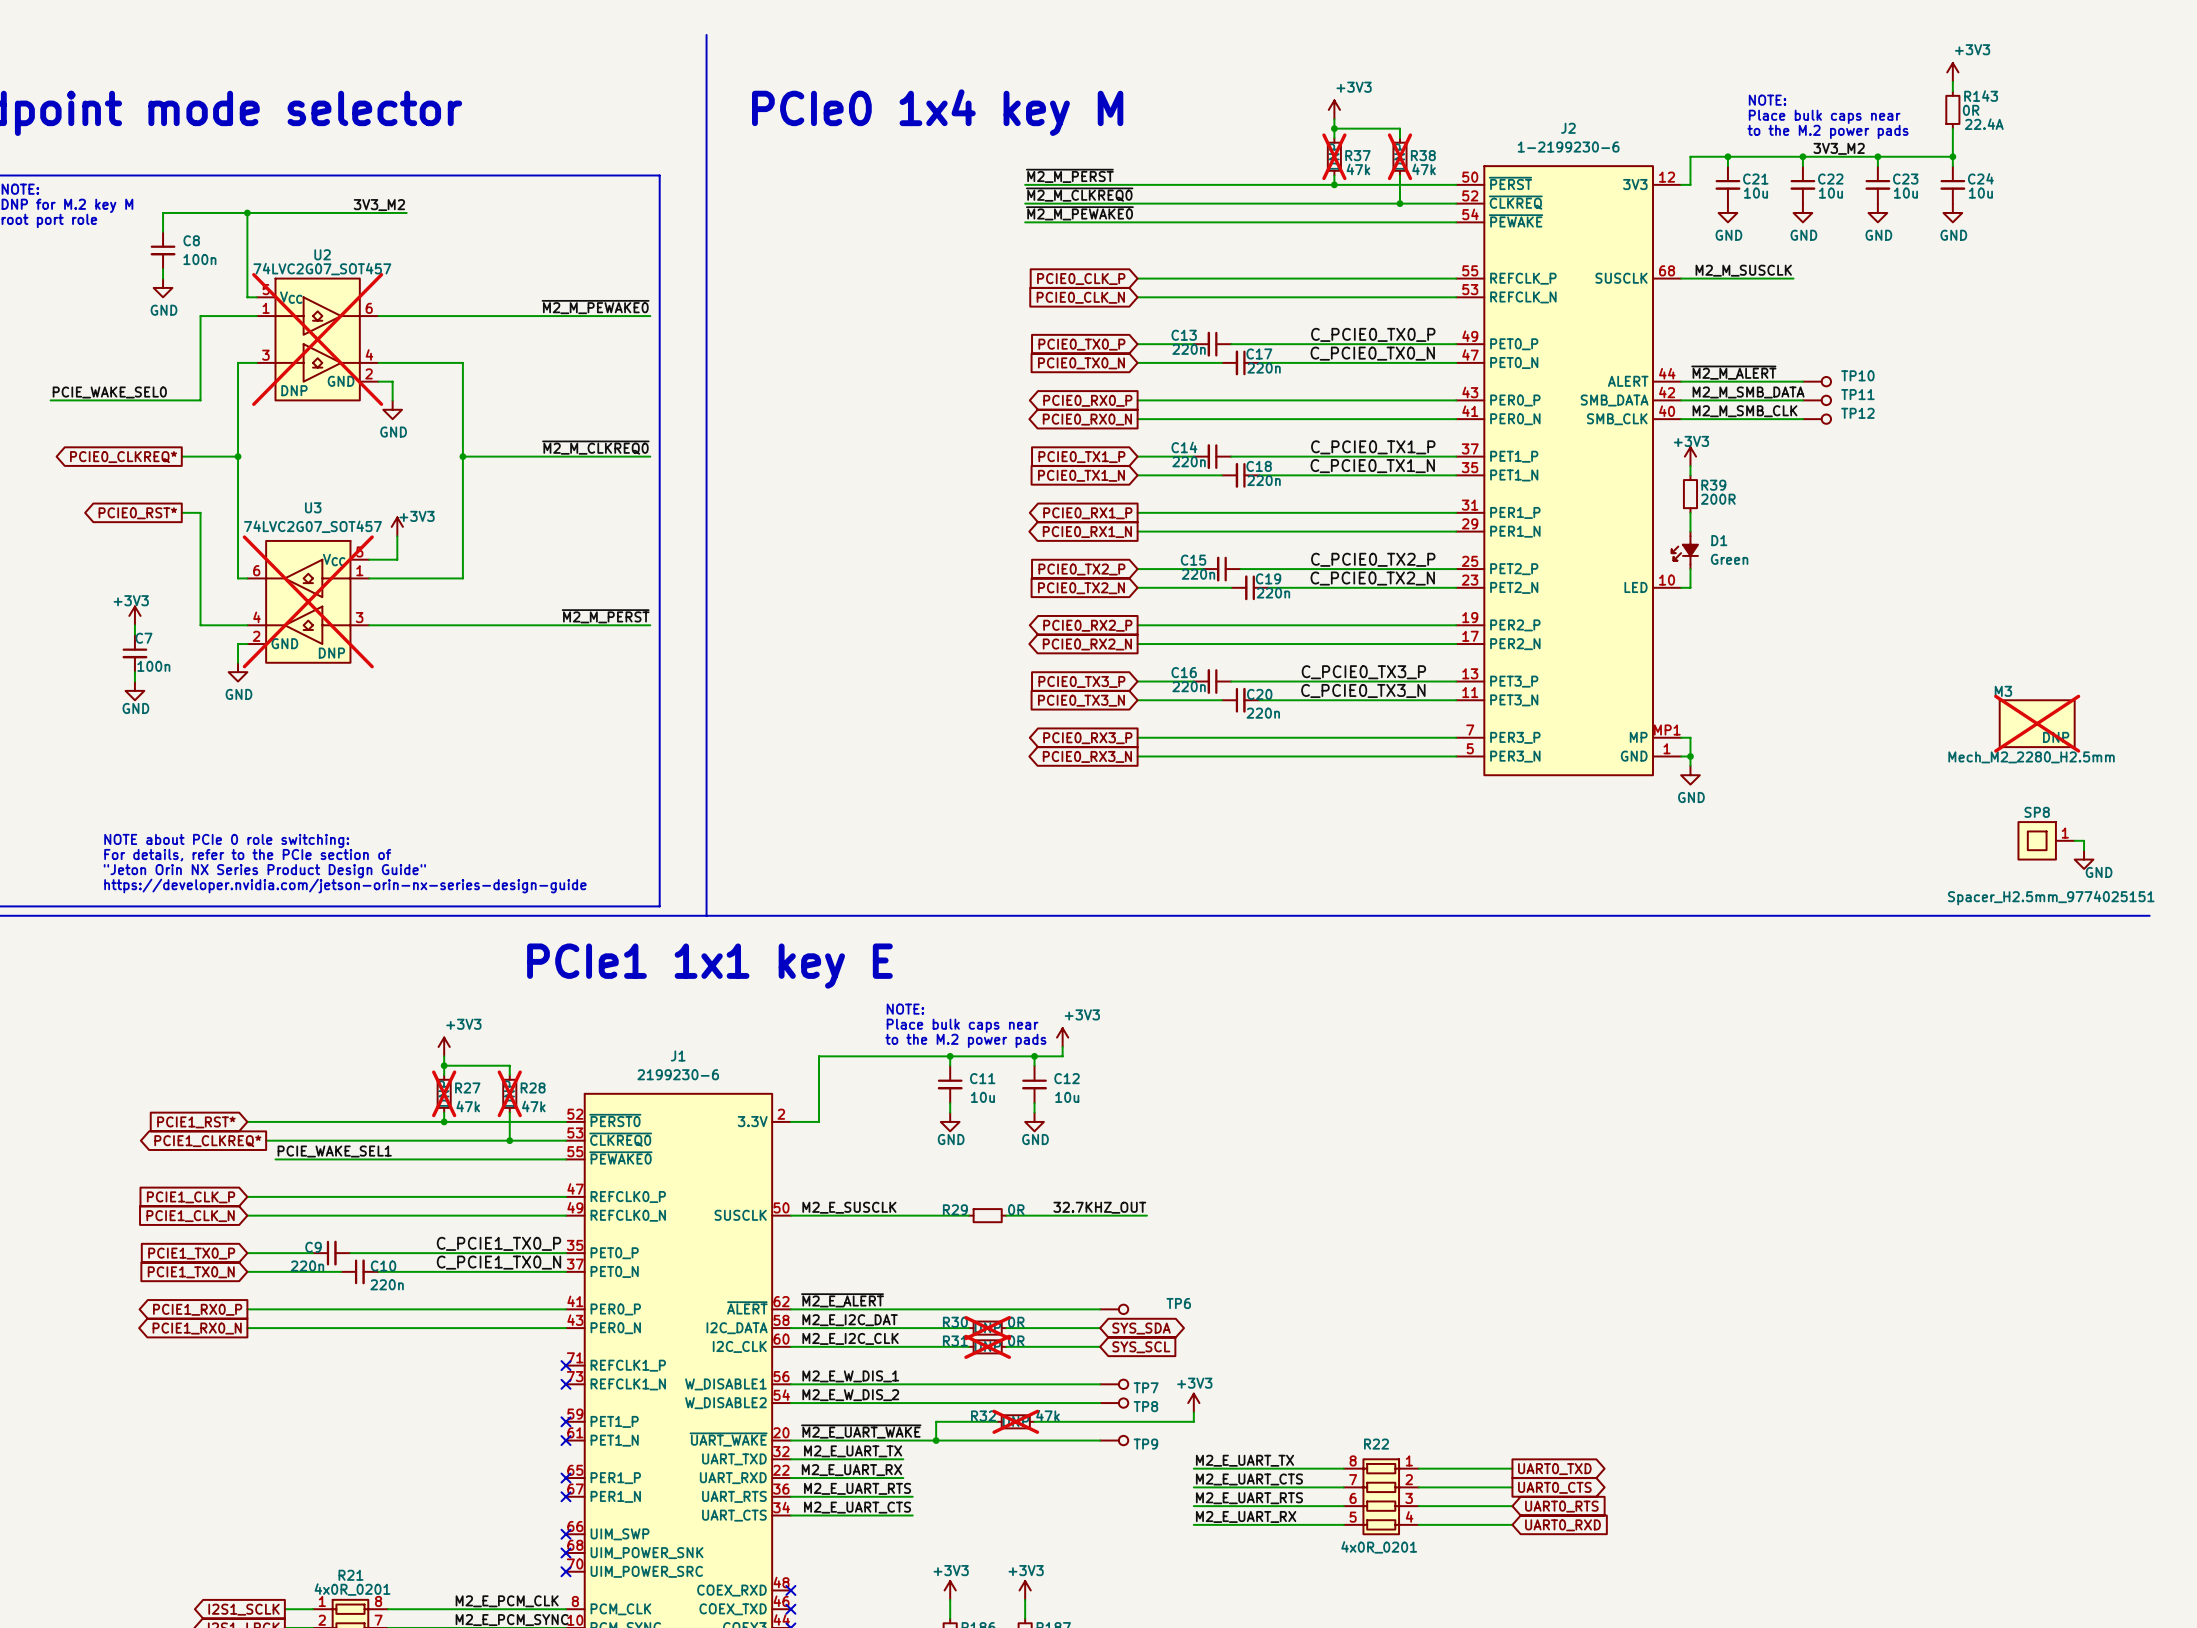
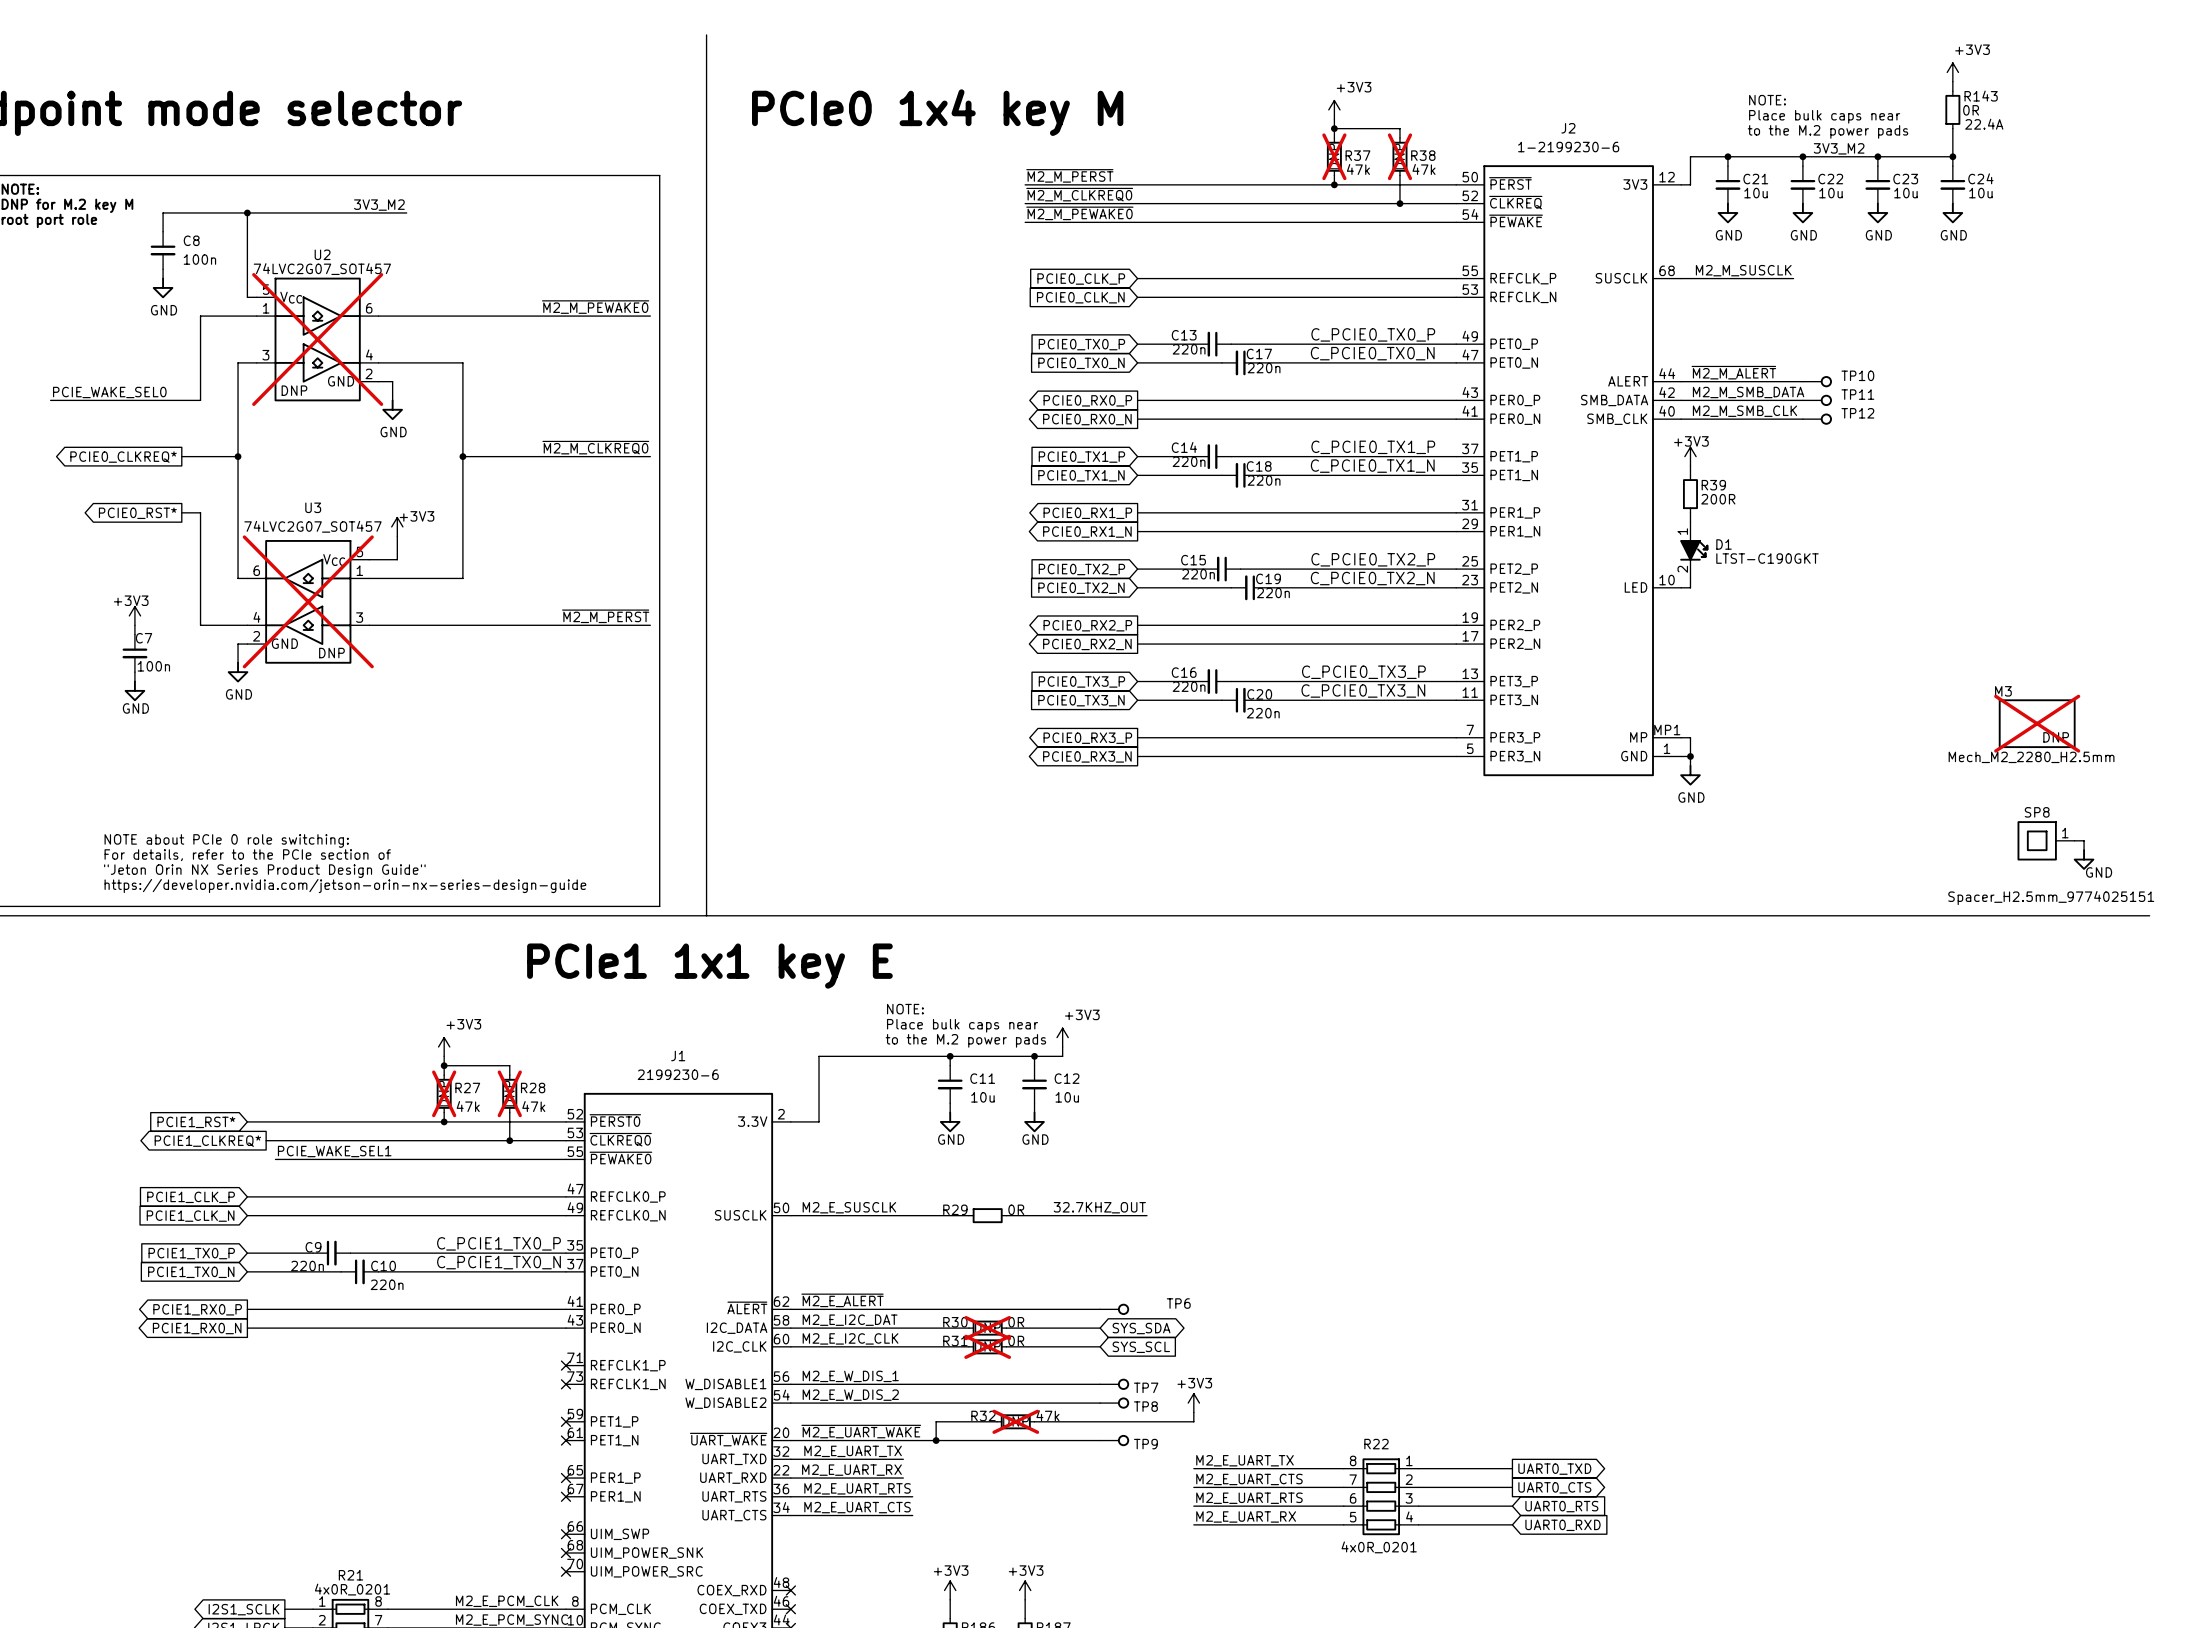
D1 symbol: [1670, 531, 1699, 570] -> [1680, 522, 1709, 579]
D1 text: none -> LTST-C190GKT (1767, 558)
D1 text: Green (1729, 559) -> none

